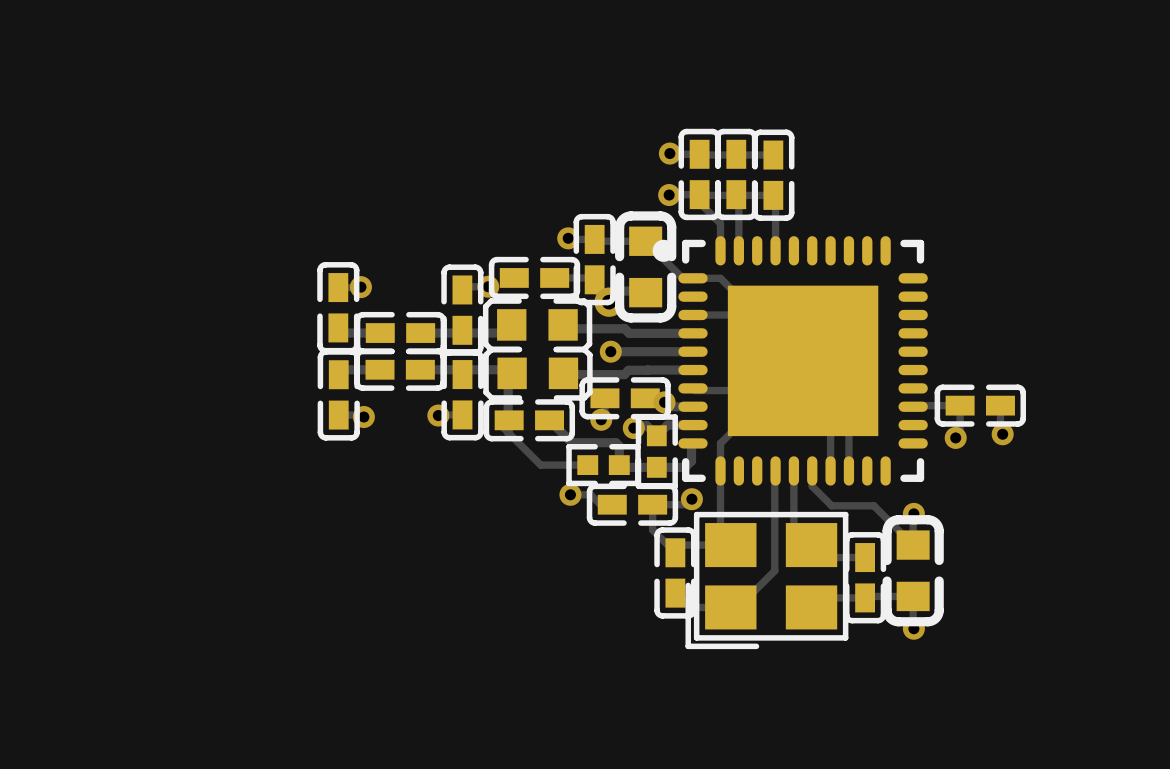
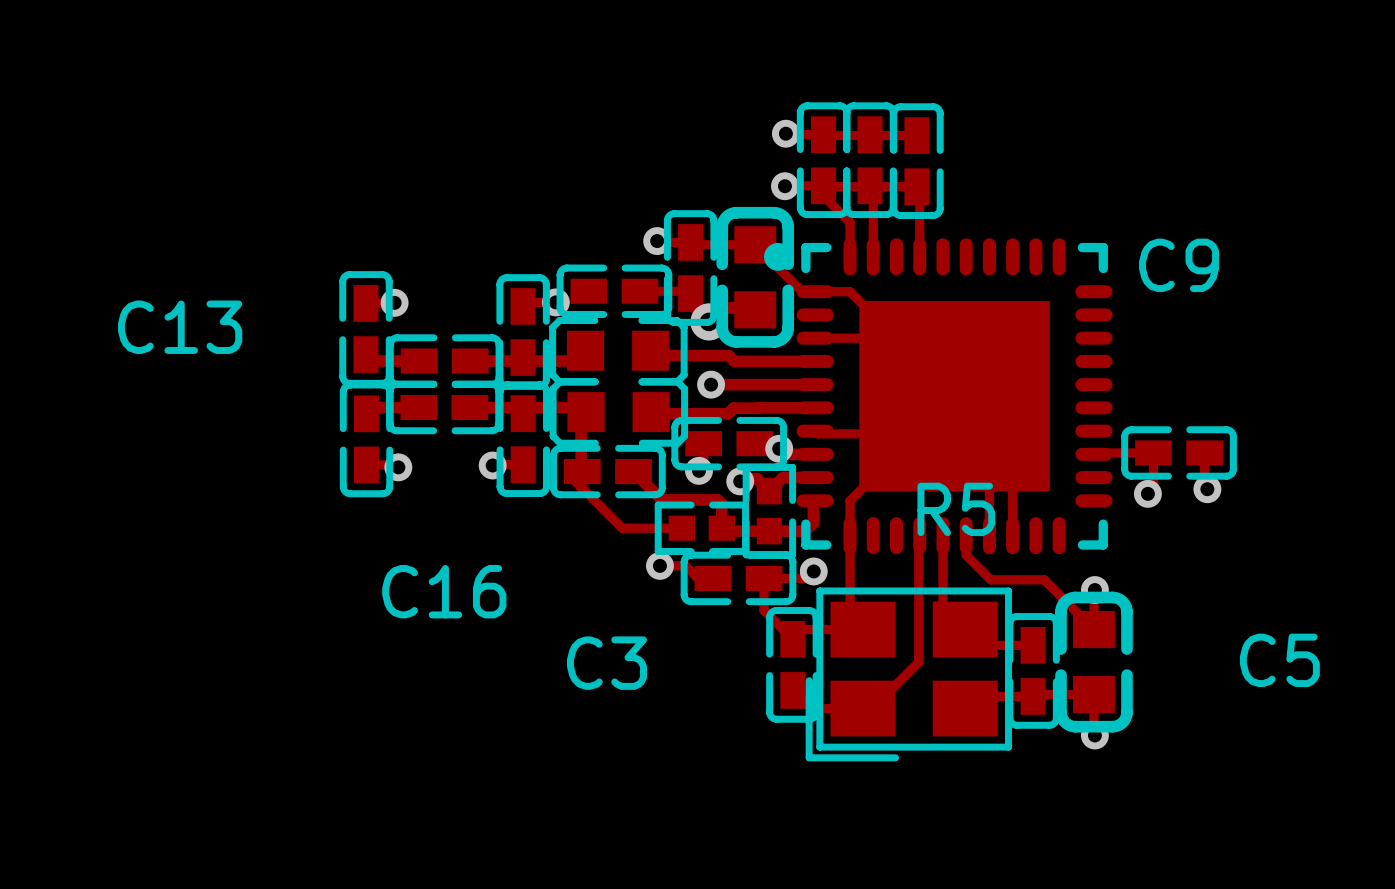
C9 name: none -> C9 (1179, 265)
C13 name: none -> C13 (180, 327)
R5 name: none -> R5 (956, 509)
C16 name: none -> C16 (444, 591)
C5 name: none -> C5 (1279, 660)
C3 name: none -> C3 (606, 663)

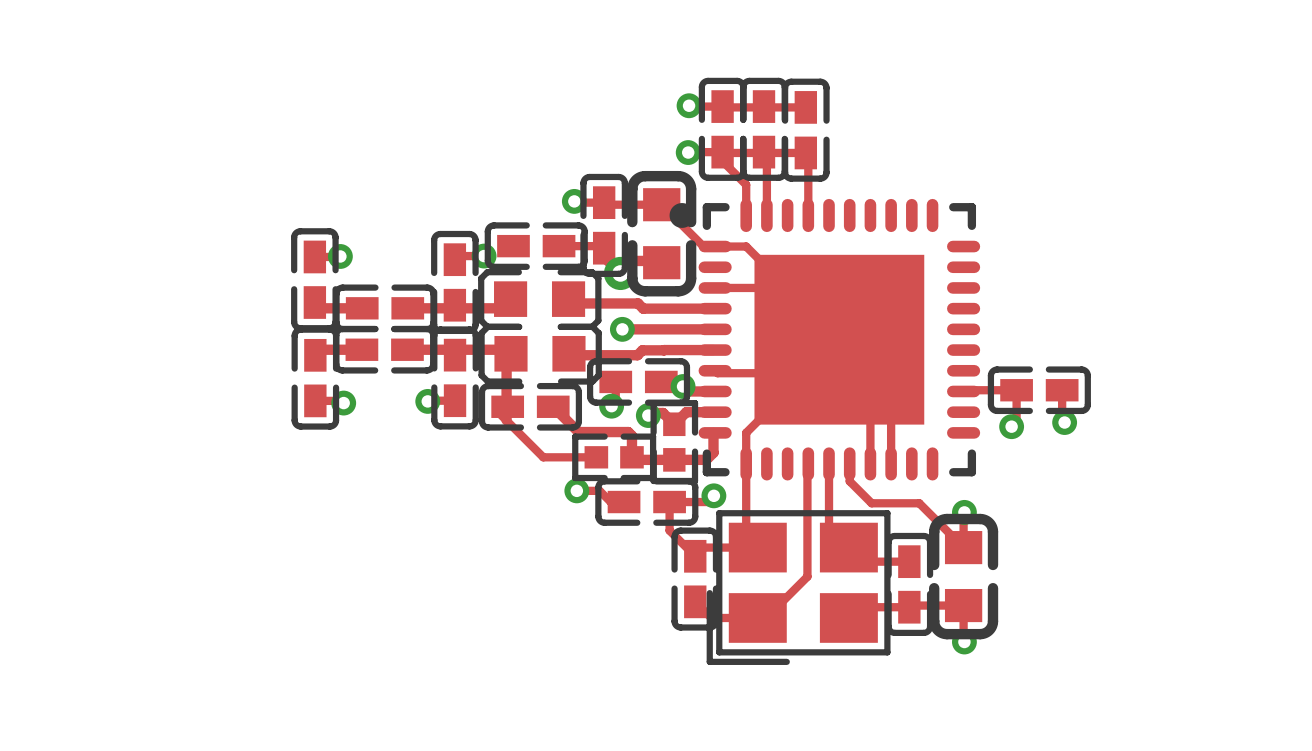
C9 name: C9 (1179, 265) -> none
C13 name: C13 (180, 327) -> none
R5 name: R5 (956, 509) -> none
C16 name: C16 (444, 591) -> none
C5 name: C5 (1279, 660) -> none
C3 name: C3 (606, 663) -> none

